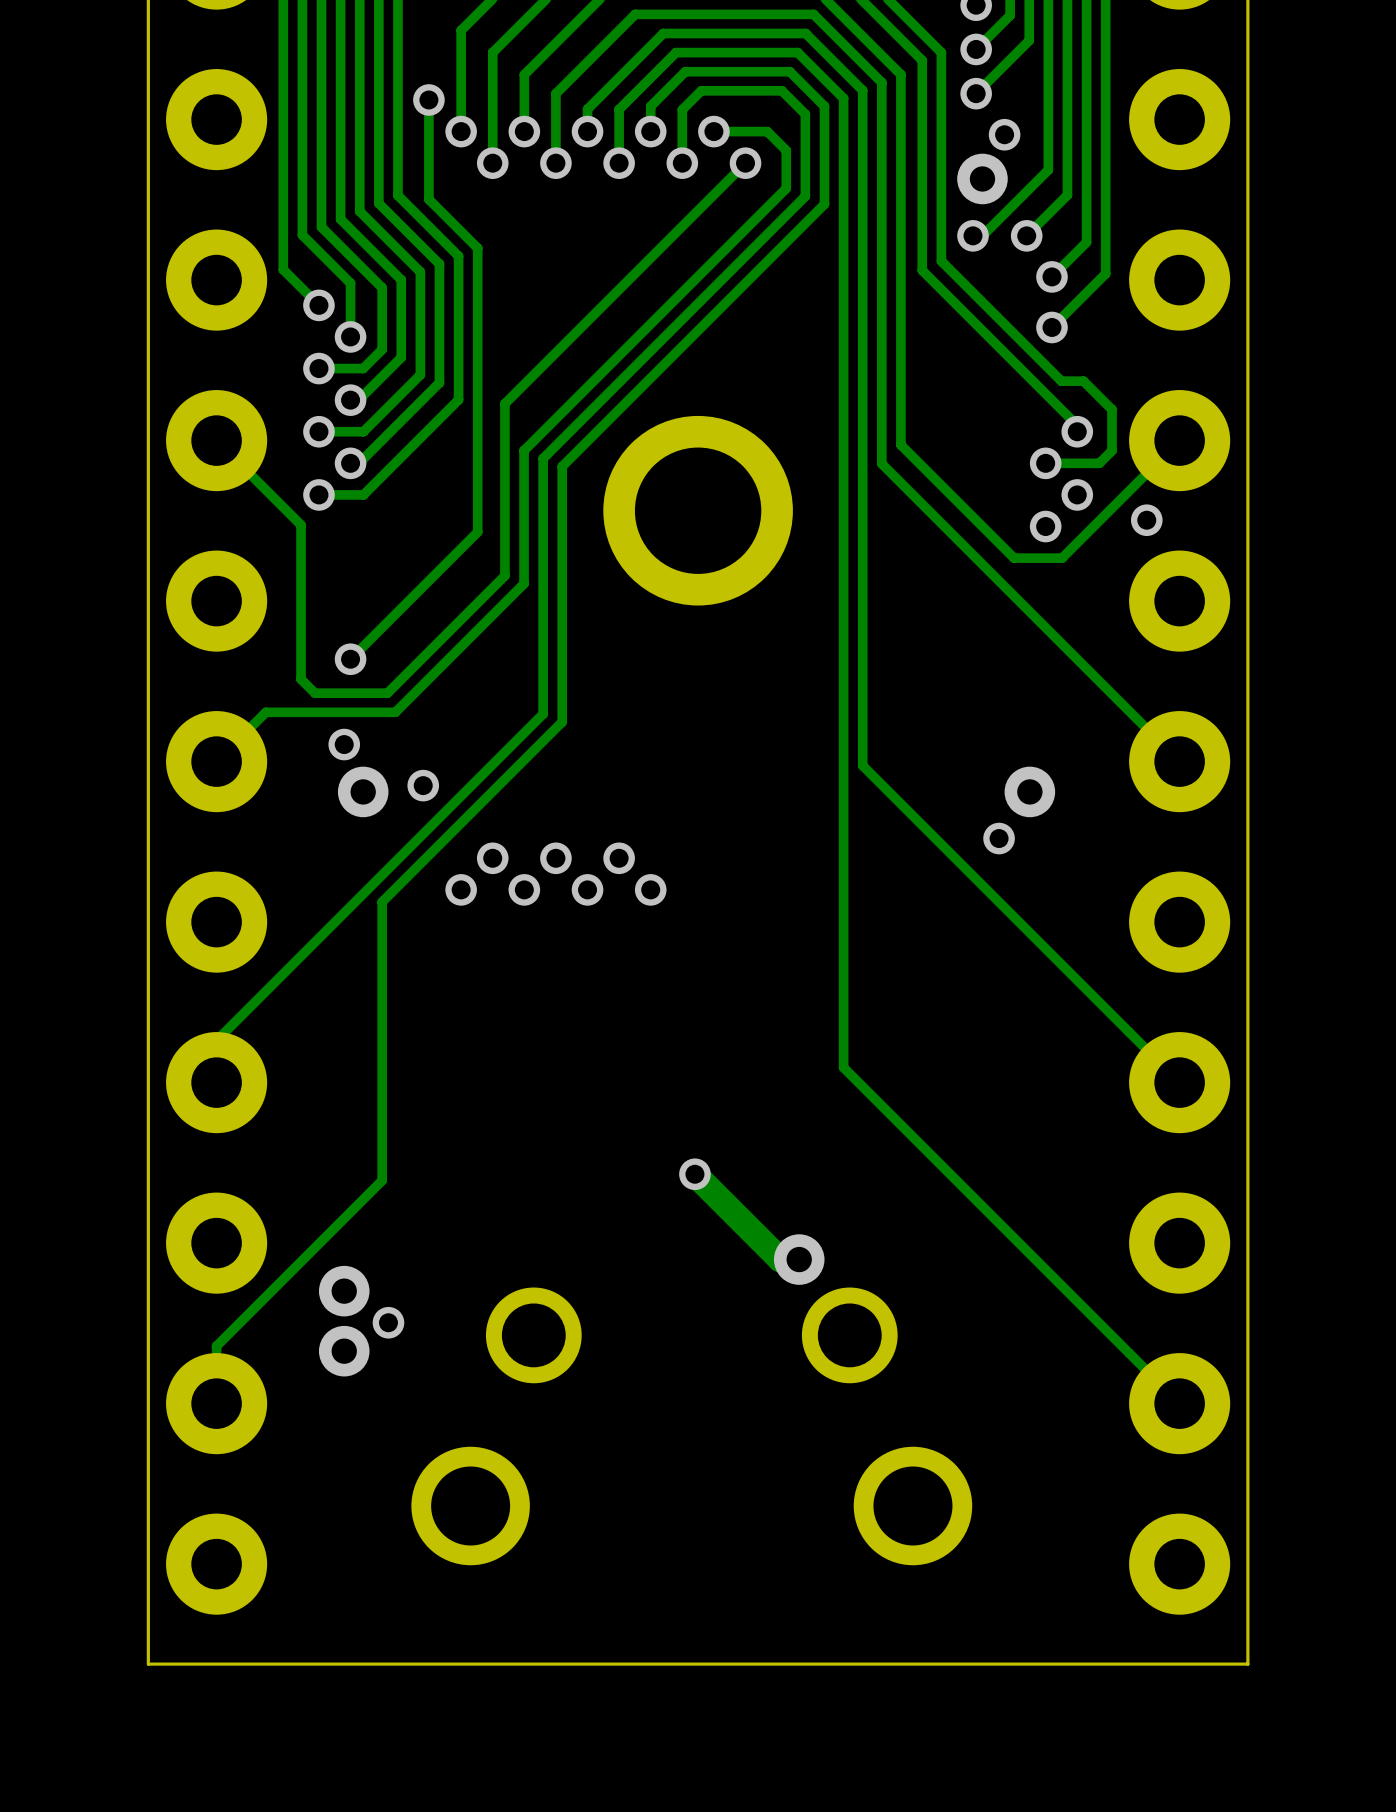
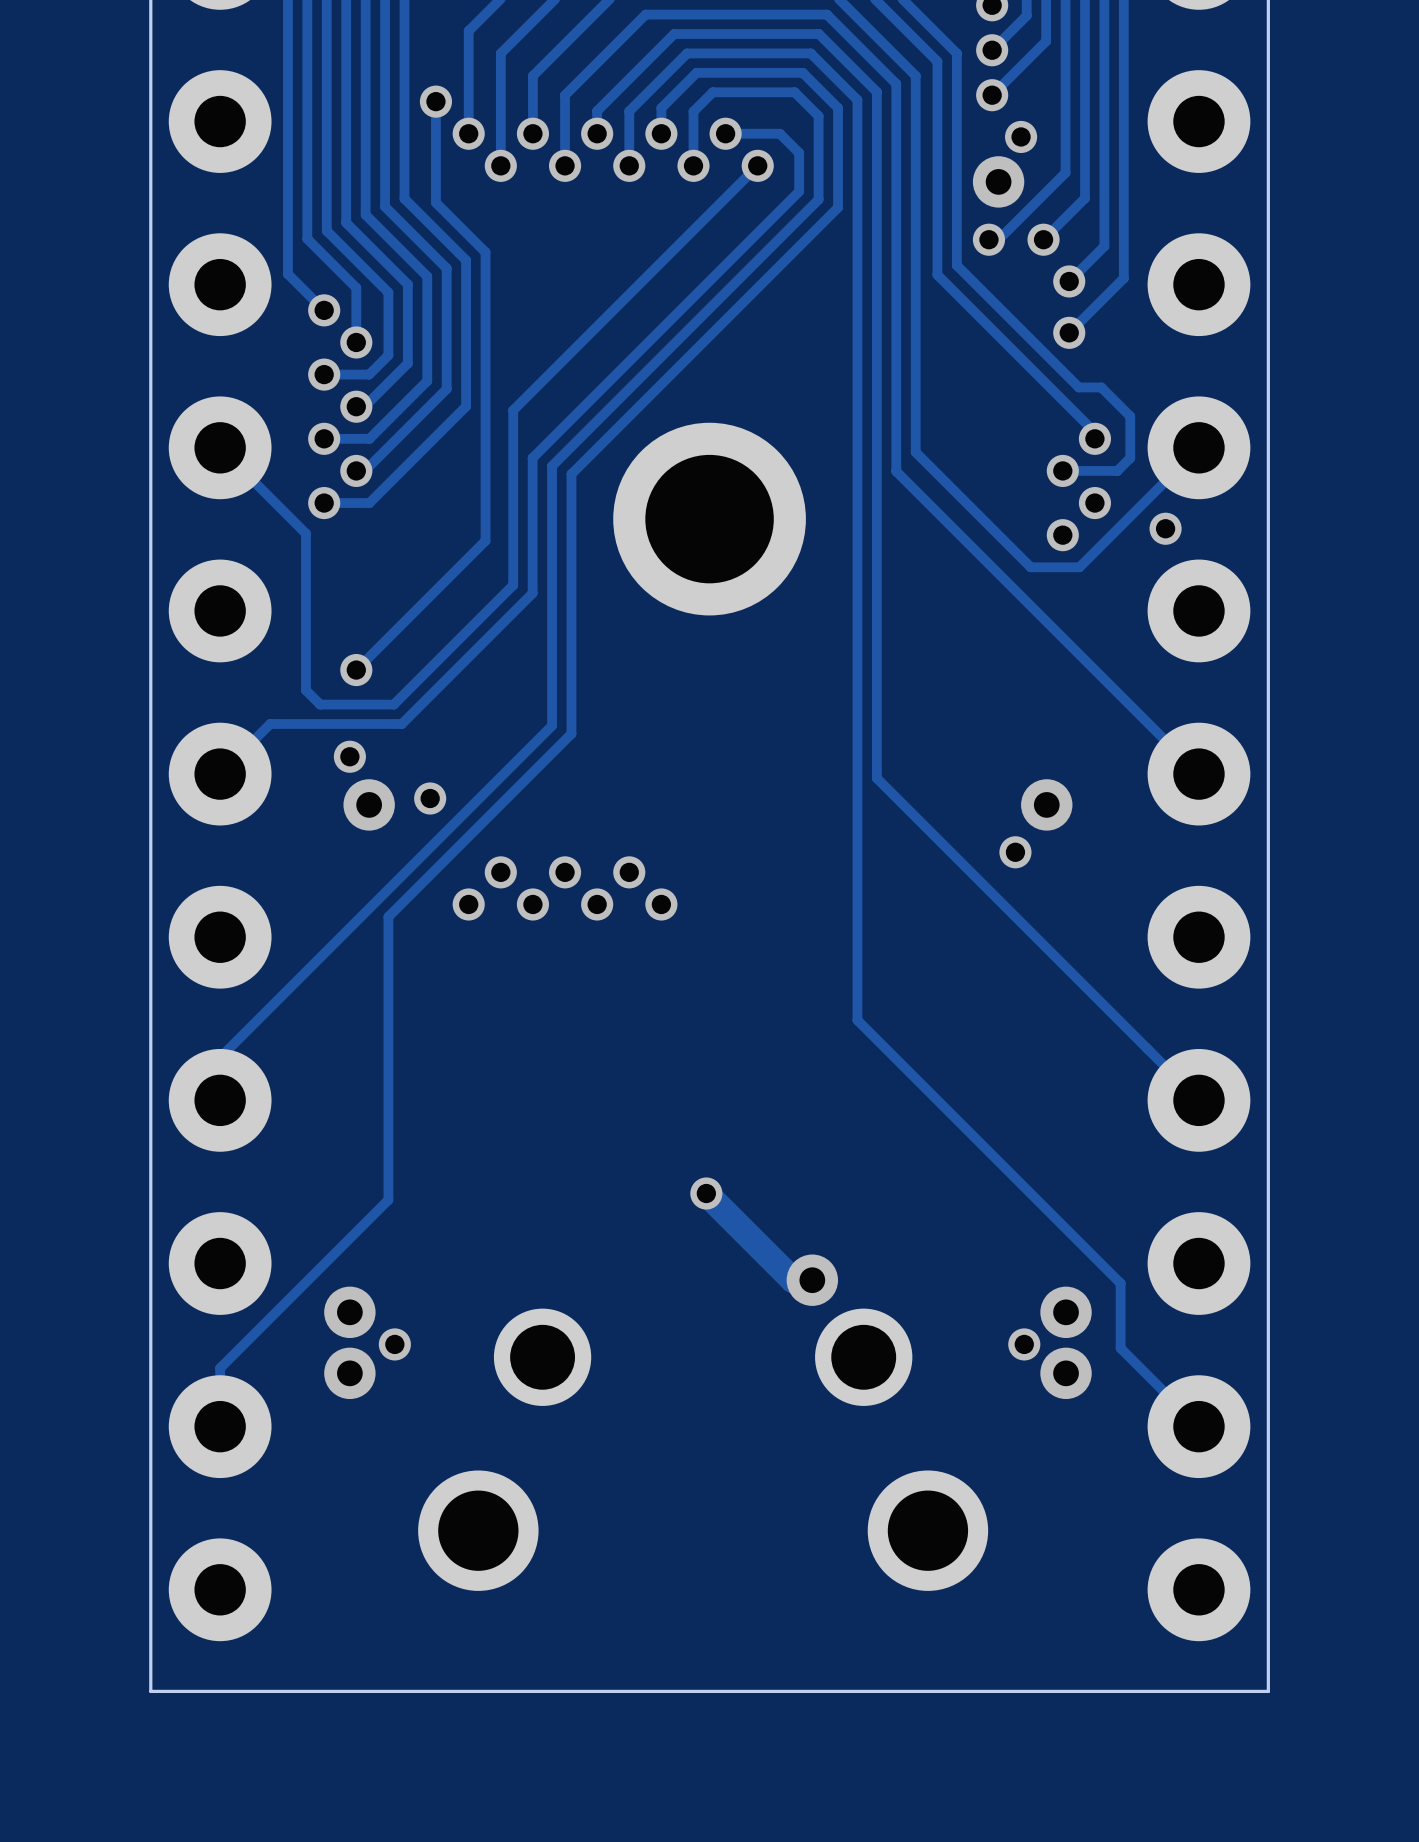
track: (843, 1003) (843, 1067) (1102, 1326) -> (857, 1020) (1120, 1283) (1120, 1348)
via: none -> (1066, 1312)
via: none -> (1024, 1344)
via: none -> (1066, 1373)

